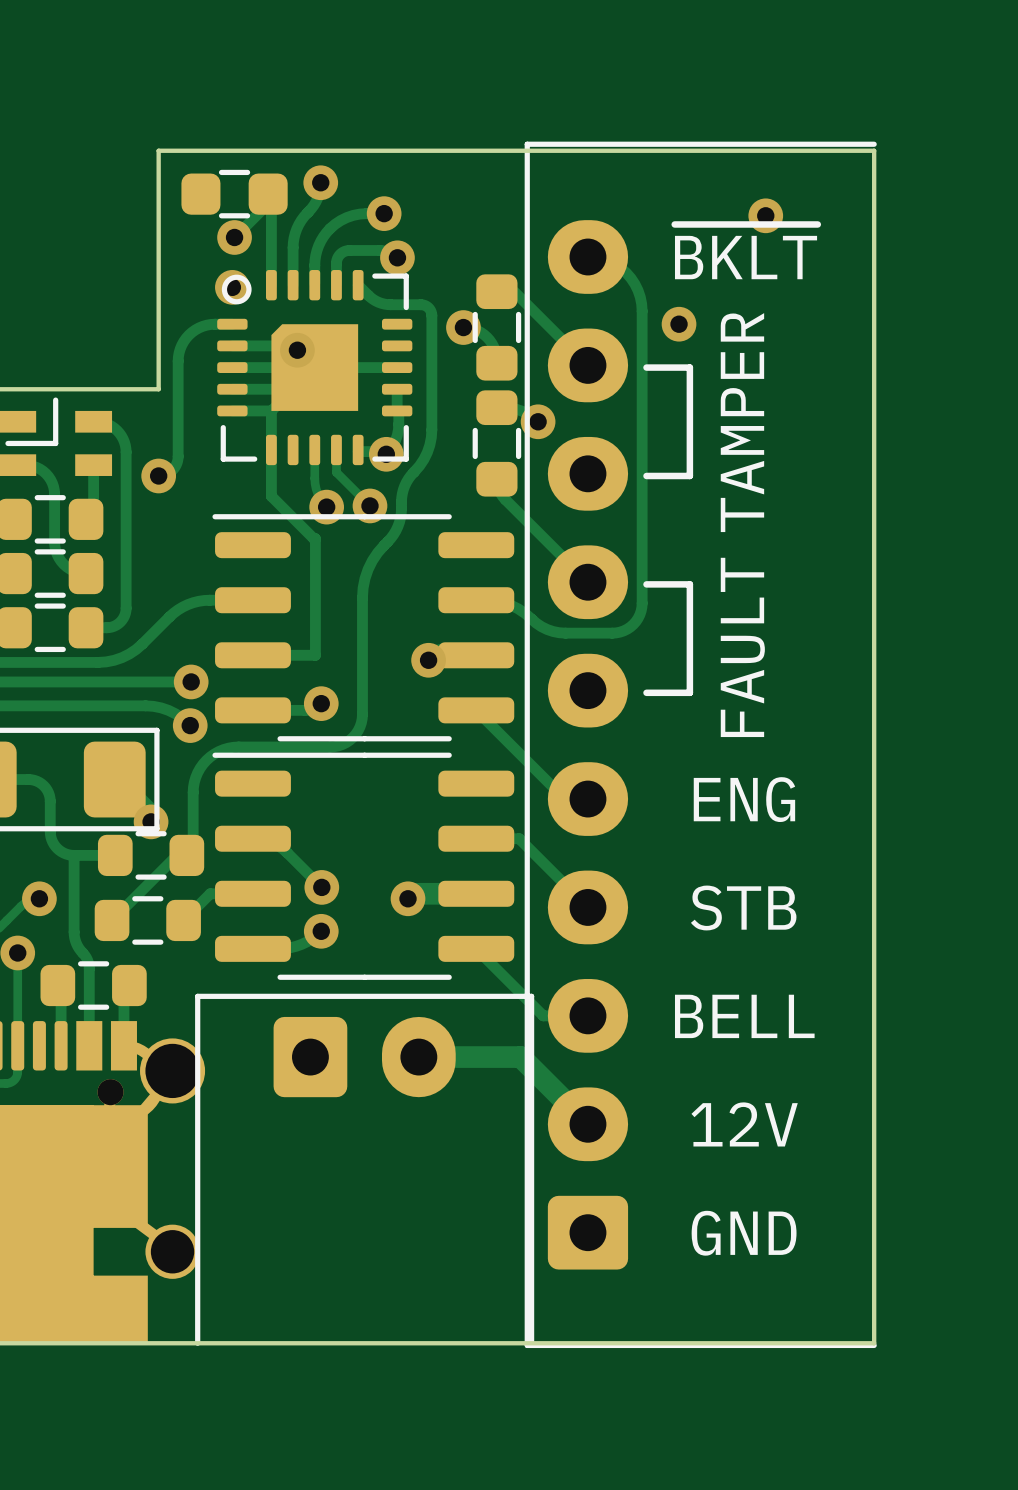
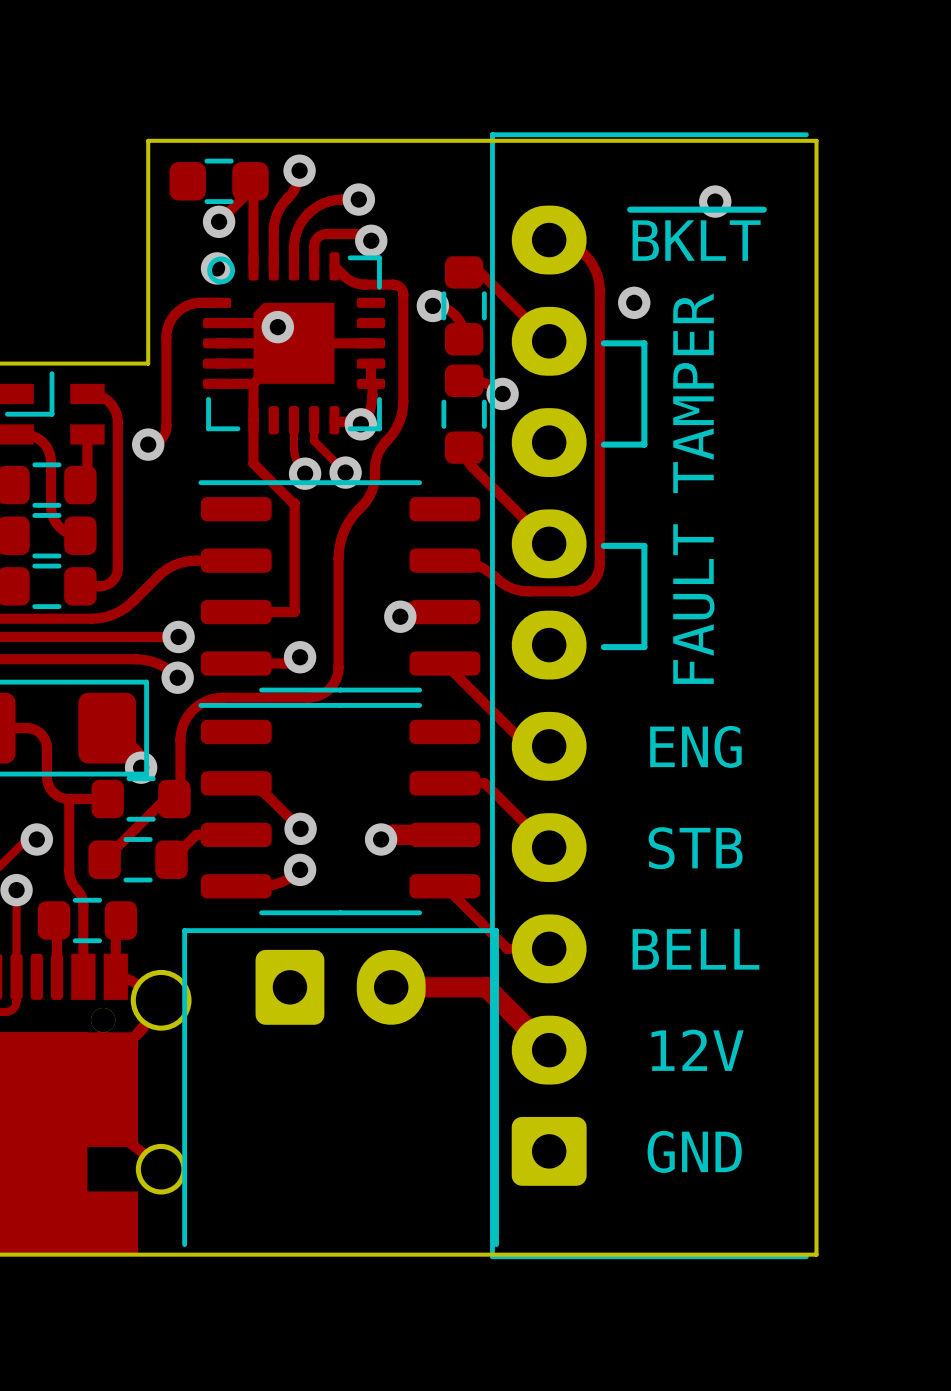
part footprint: [524, 141, 877, 1349] -> [490, 132, 809, 1260]
part footprint: [195, 993, 535, 1346] -> [182, 928, 499, 1247]

